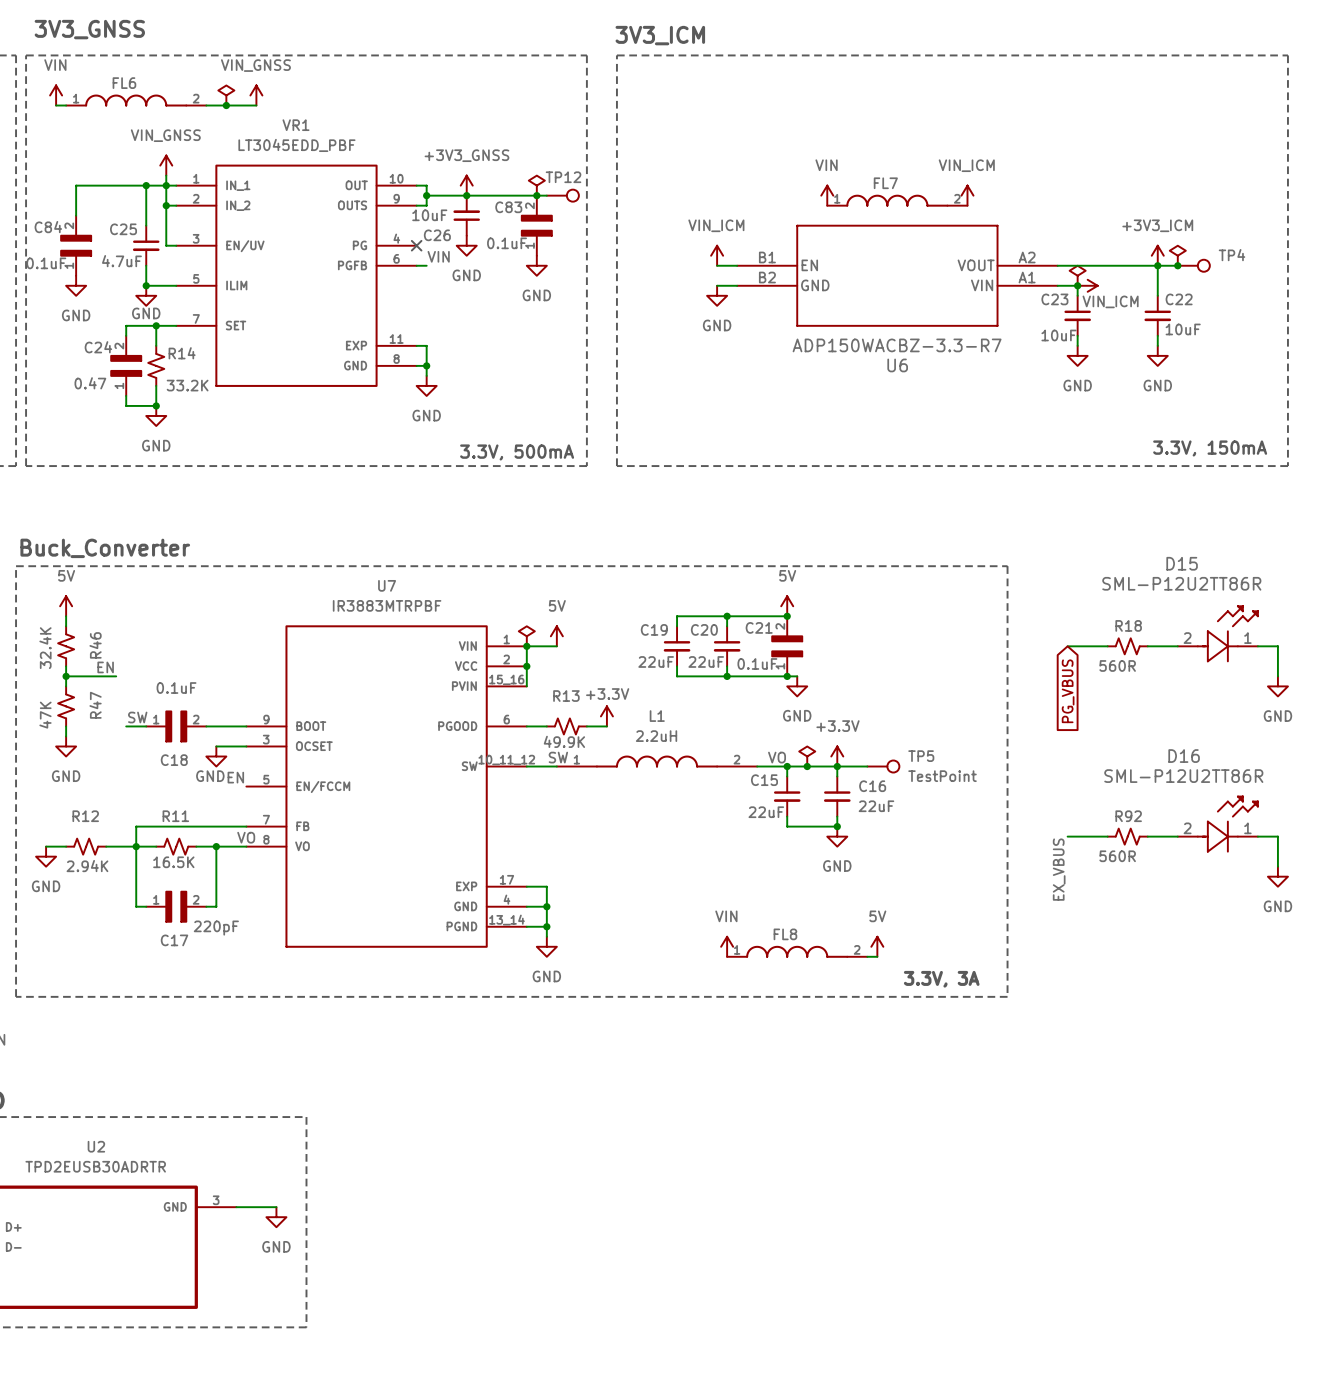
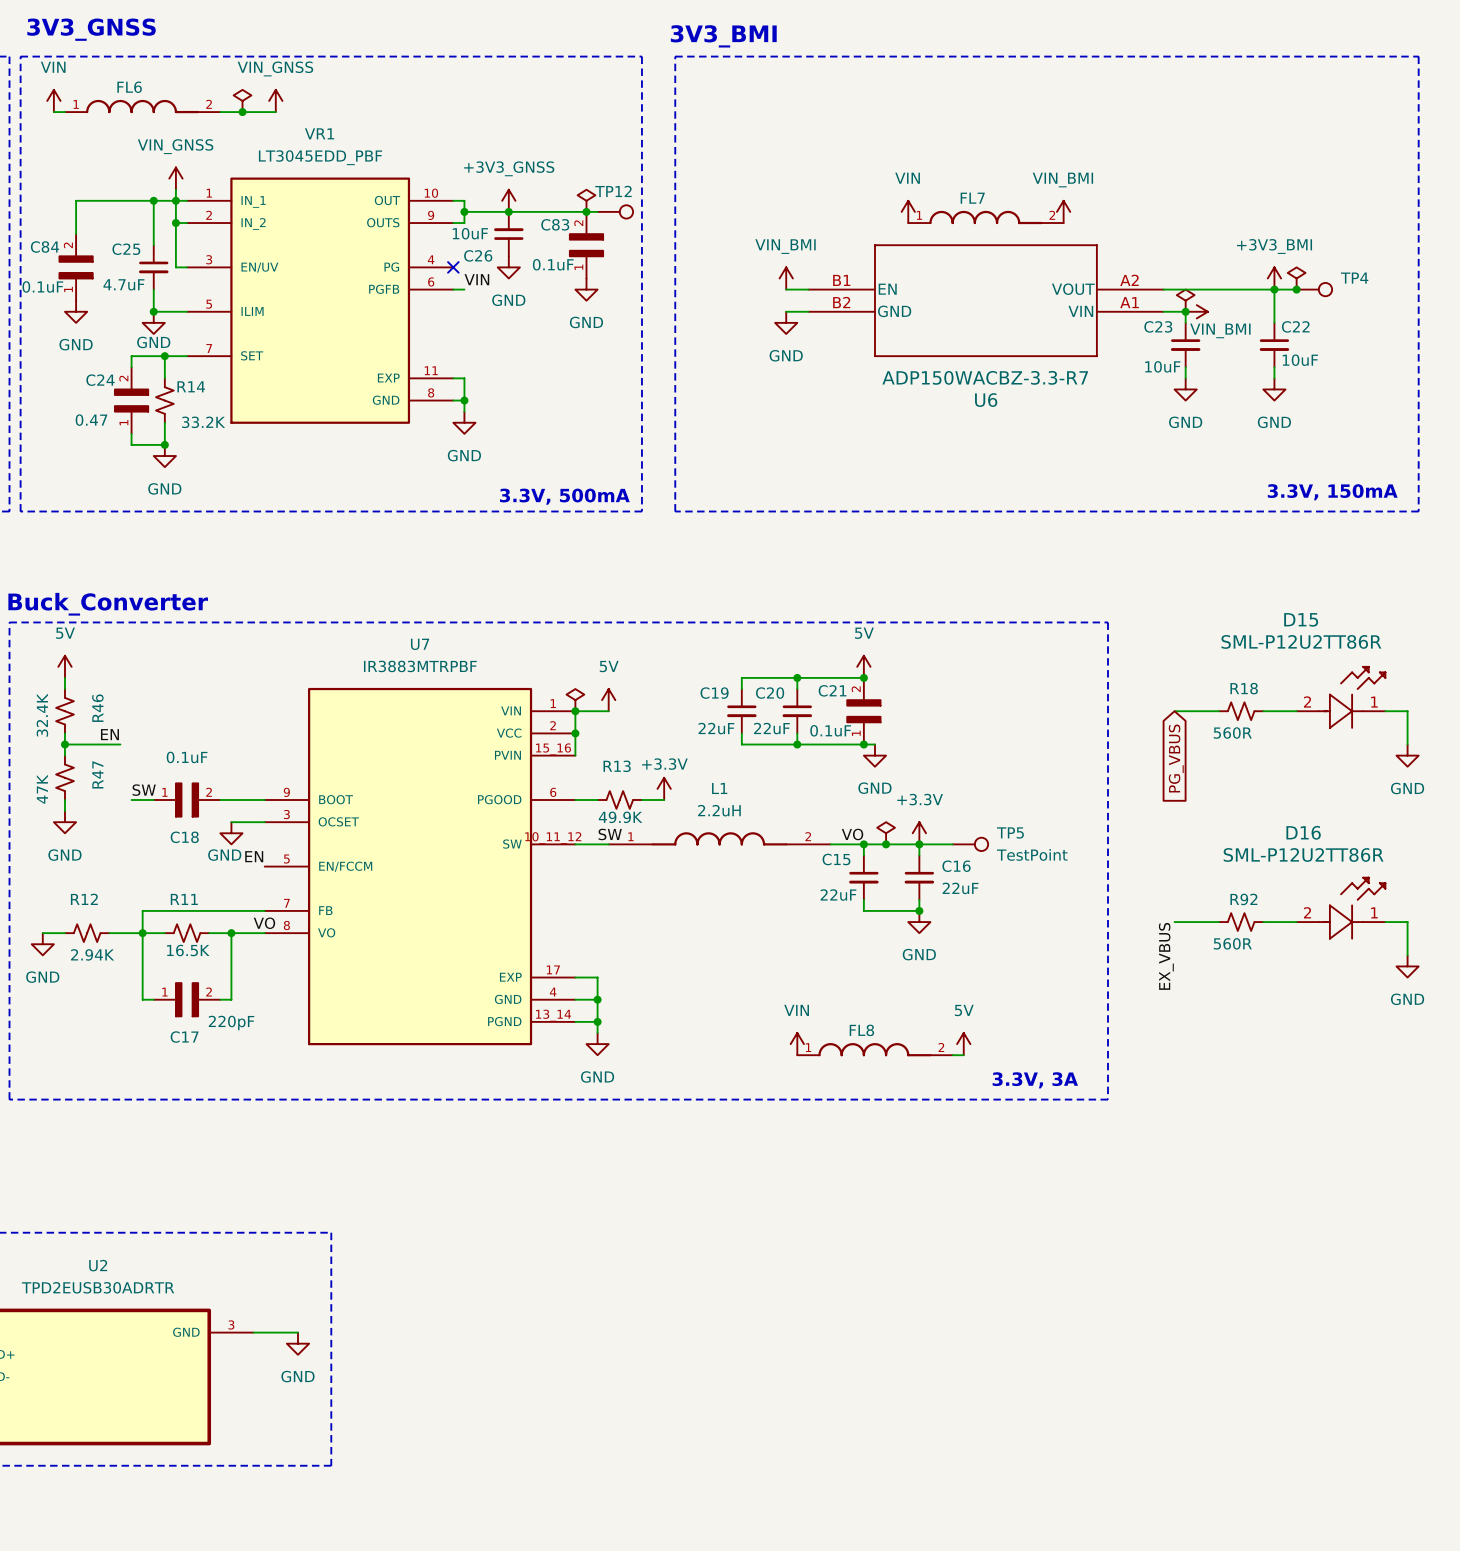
text: 3V3_ICM (660, 35) -> 3V3_BMI (723, 36)
power symbol: VIN_ICM (967, 195) -> VIN_BMI (1063, 211)
power symbol: VIN_ICM (717, 255) -> VIN_BMI (786, 278)
power symbol: +3V3_ICM (1157, 255) -> +3V3_BMI (1274, 278)
power symbol: VIN_ICM (1087, 285) -> VIN_BMI (1196, 311)

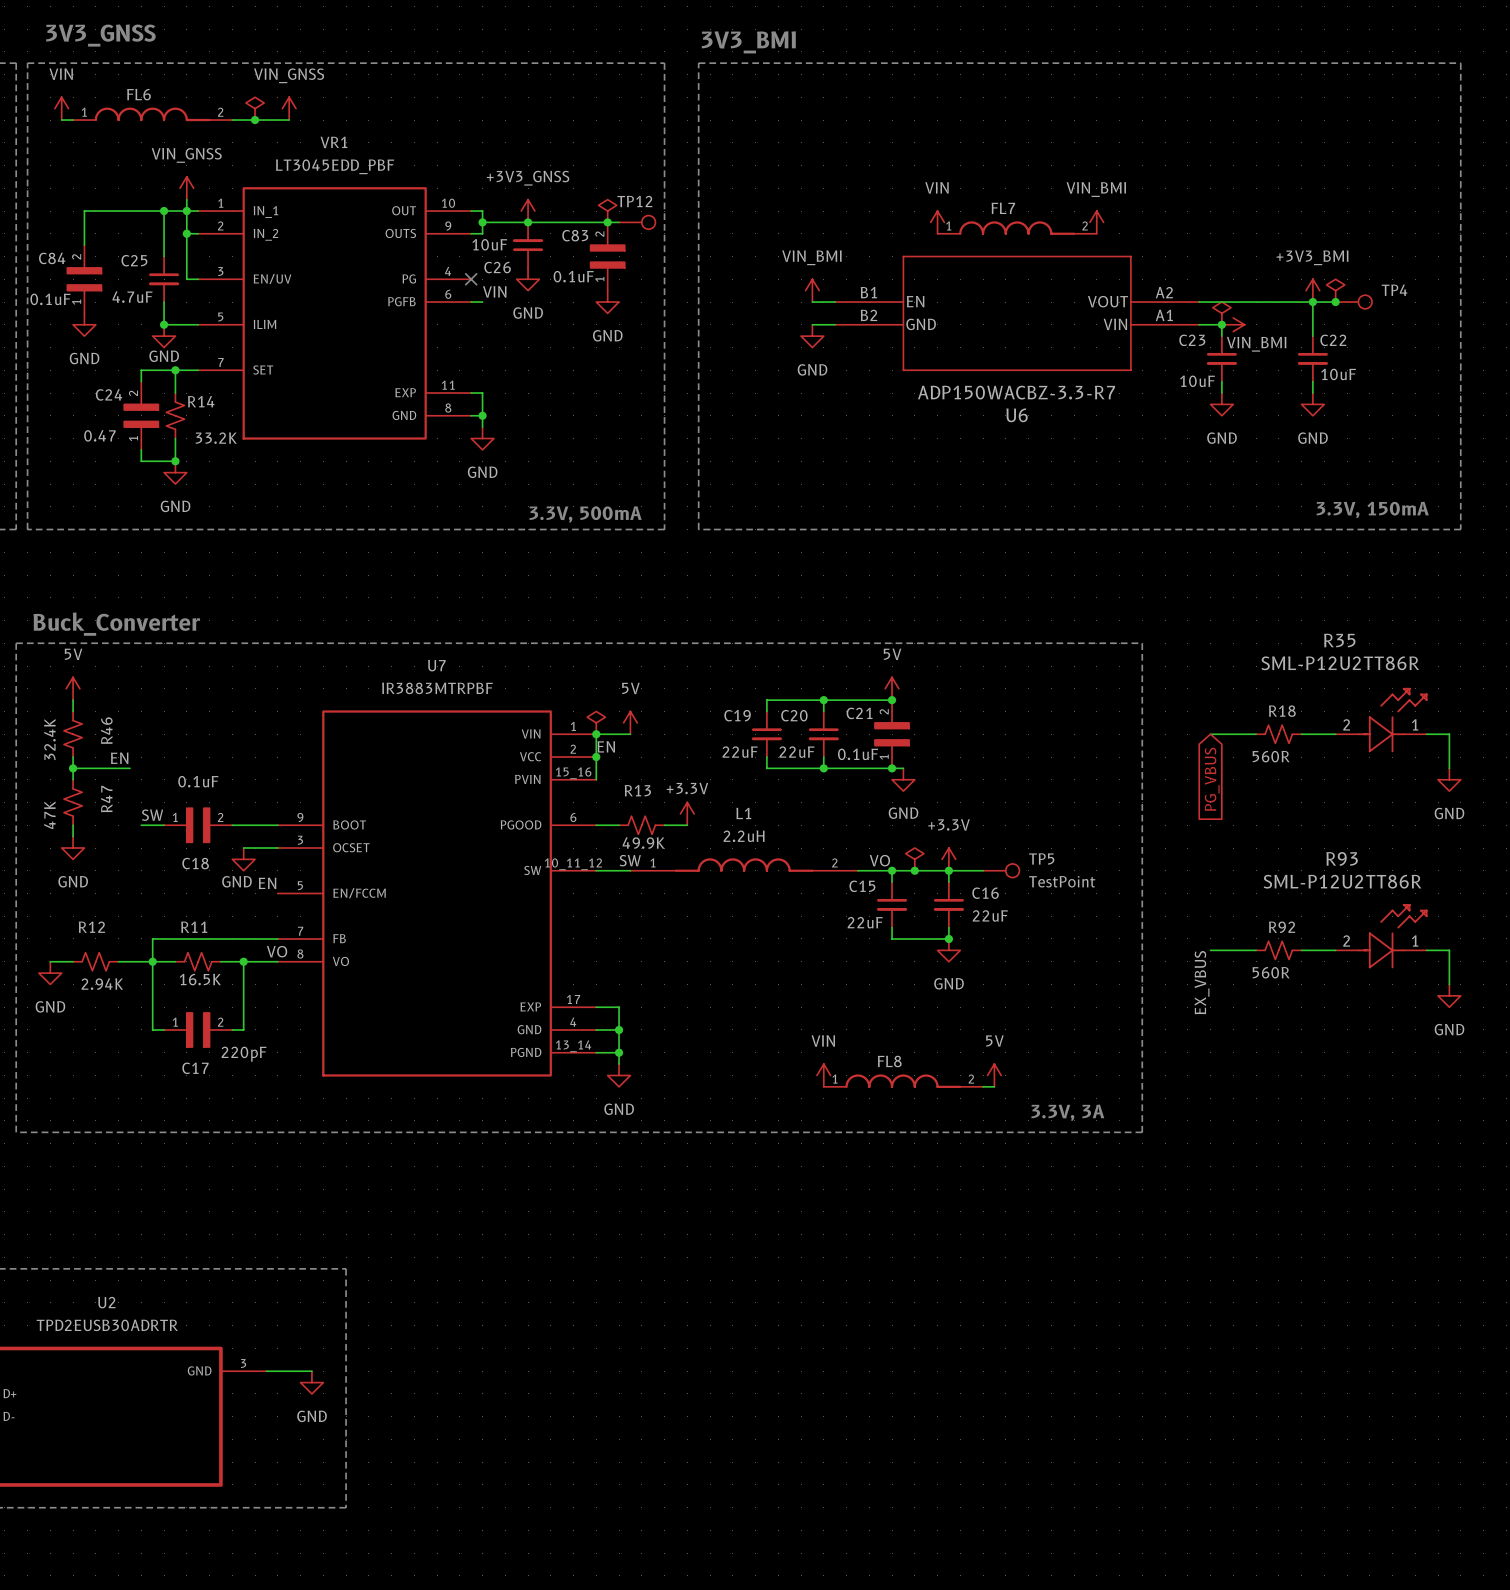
D15 name: D15 (1301, 619) -> R35 (1339, 640)
label: none -> EN (606, 746)
D16 name: D16 (1303, 832) -> R93 (1342, 858)

